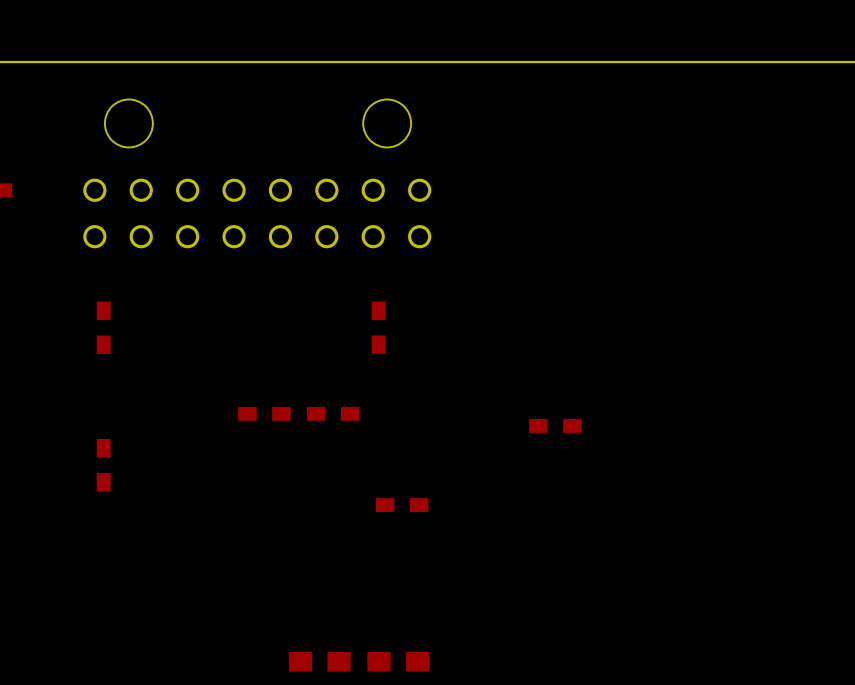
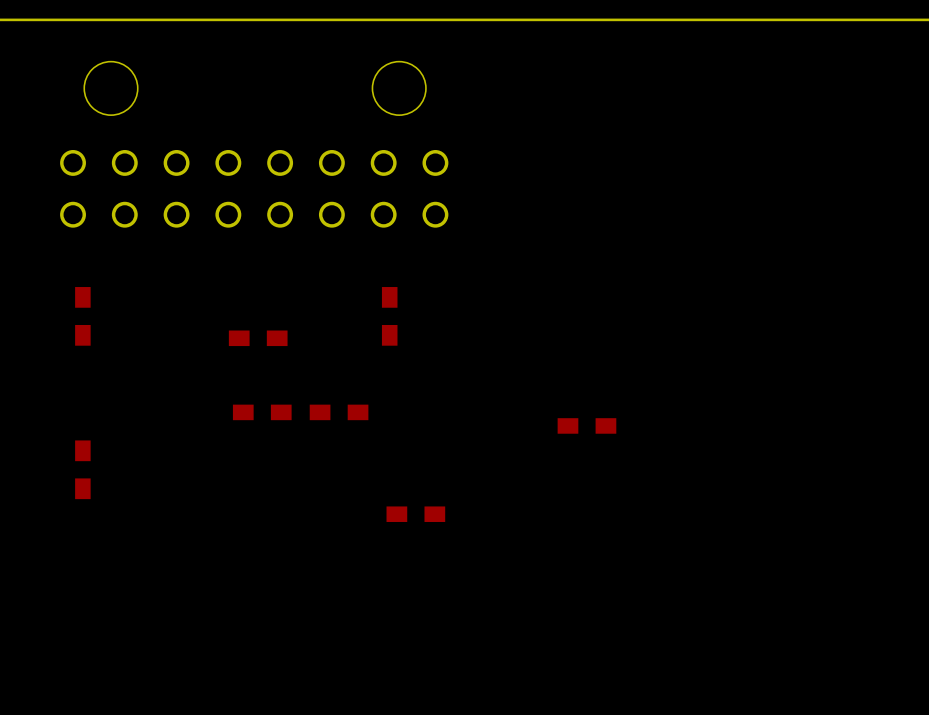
part: none -> (258, 338)
part: (319, 661) -> none
part: (398, 661) -> none

